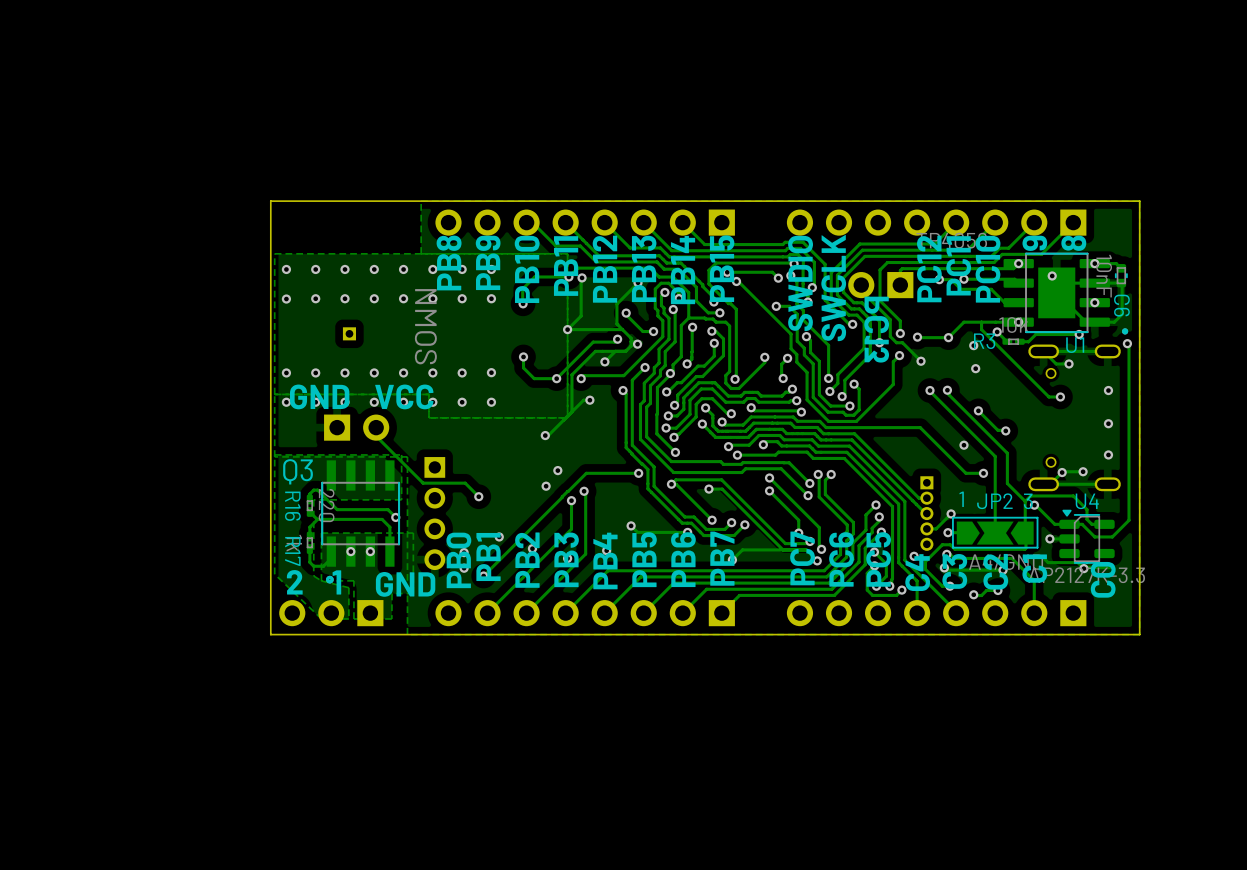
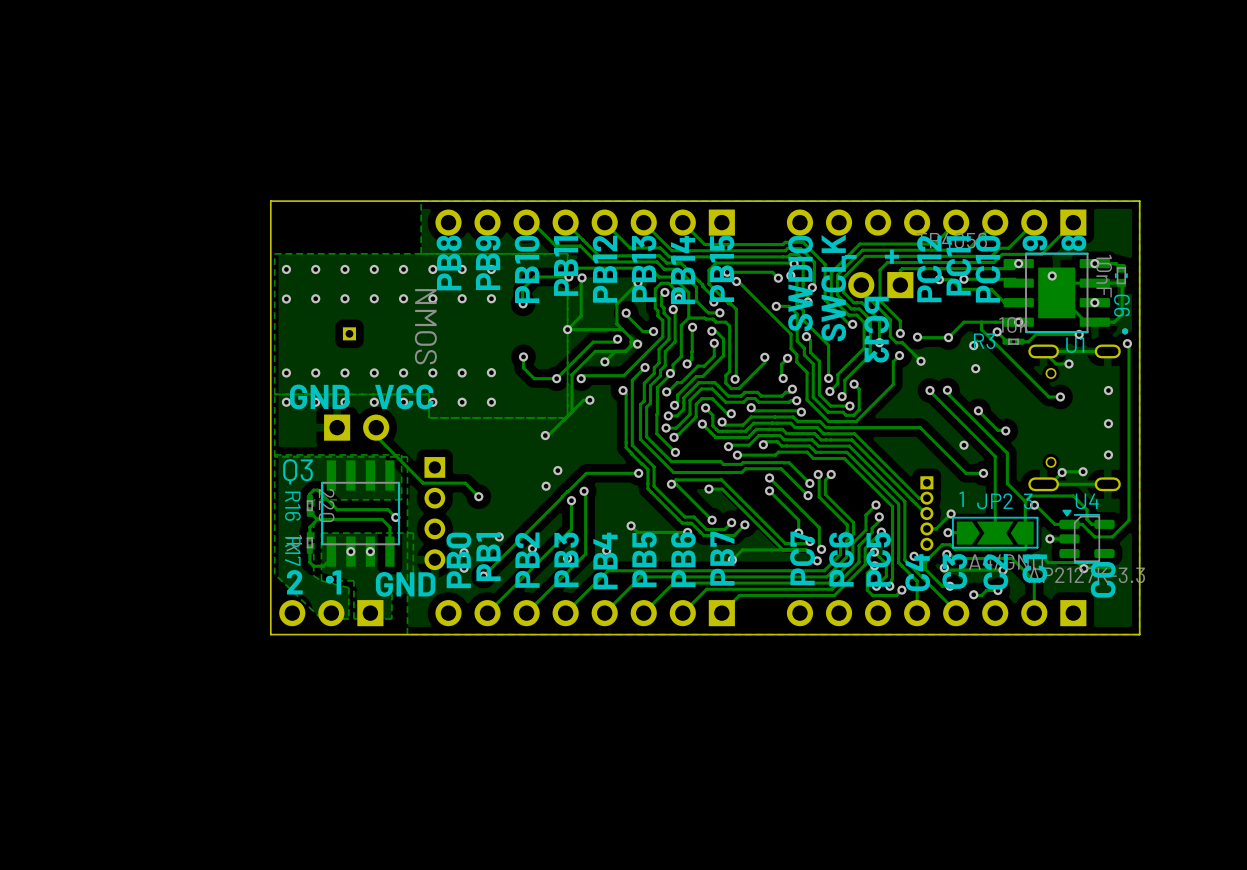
text: none -> - (850, 256)
text: none -> + (891, 256)

